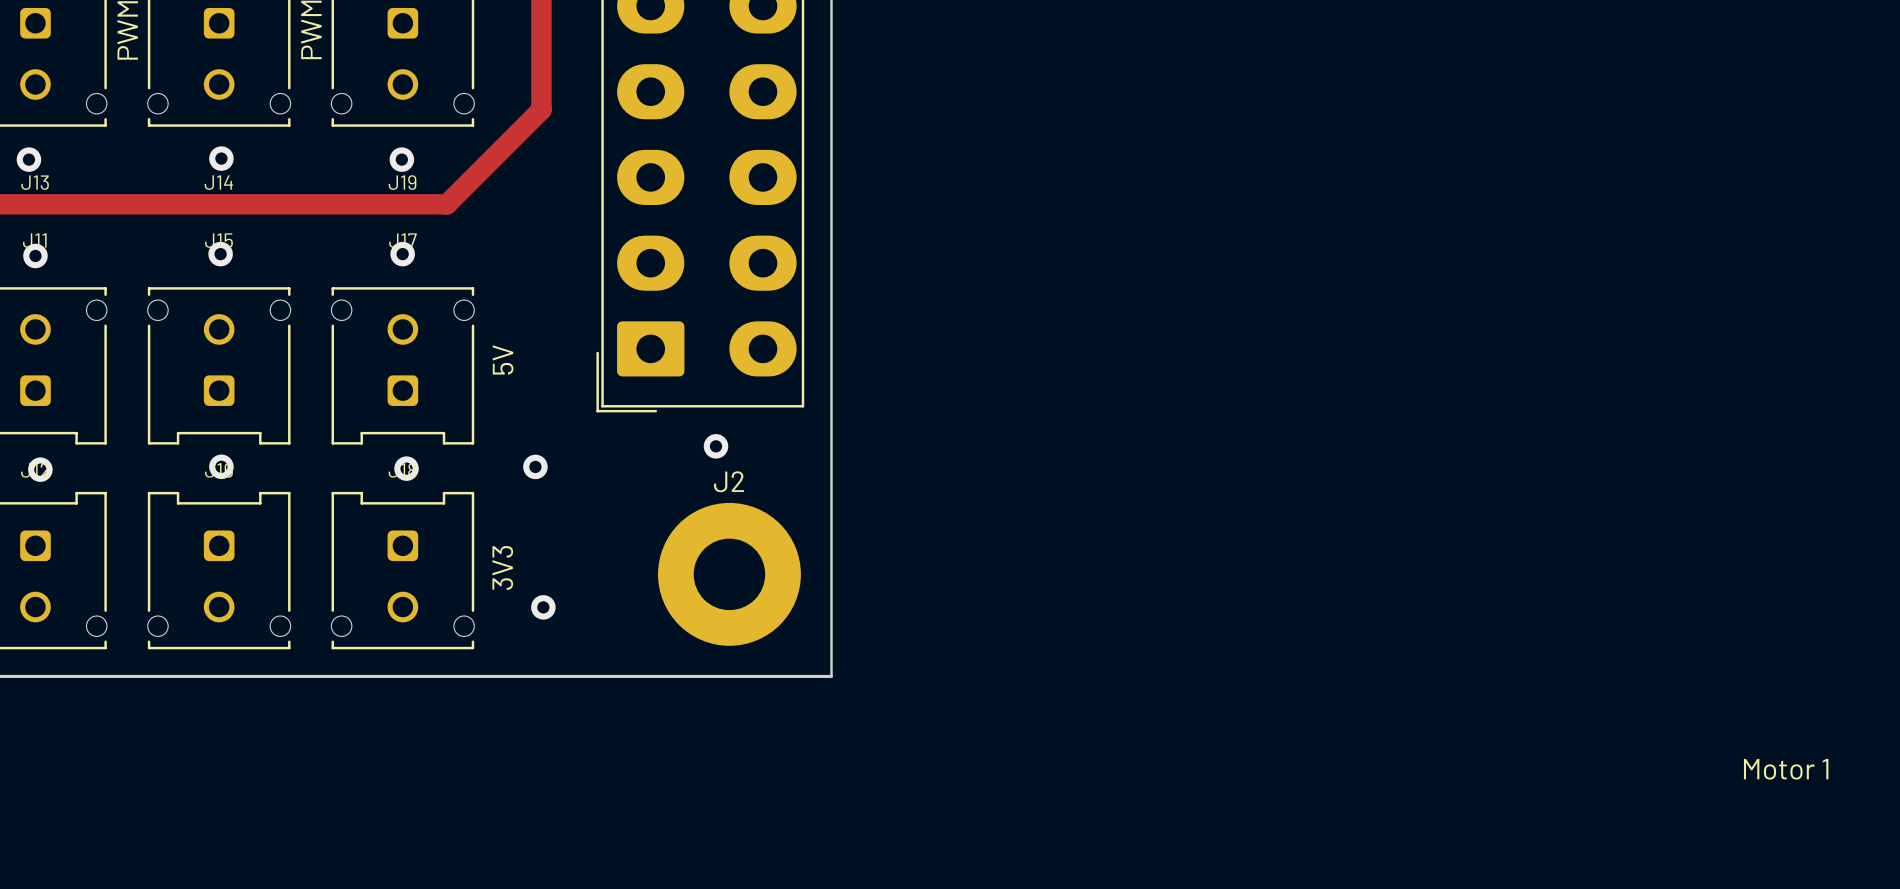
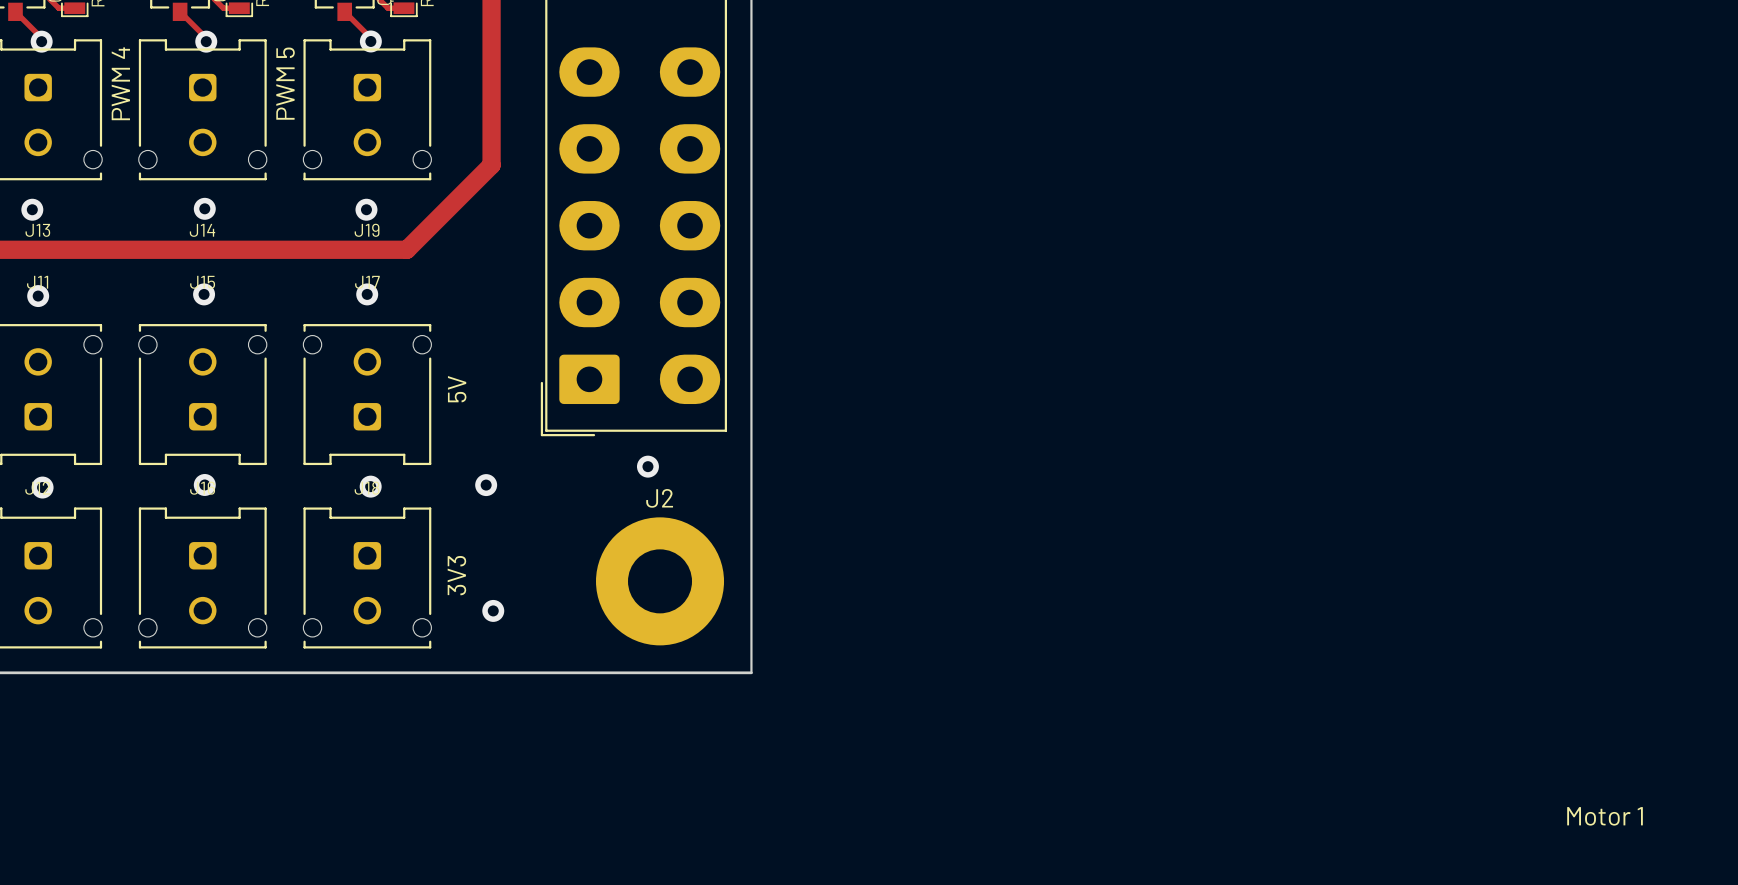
drawing position: (1786, 769) -> (1605, 816)

